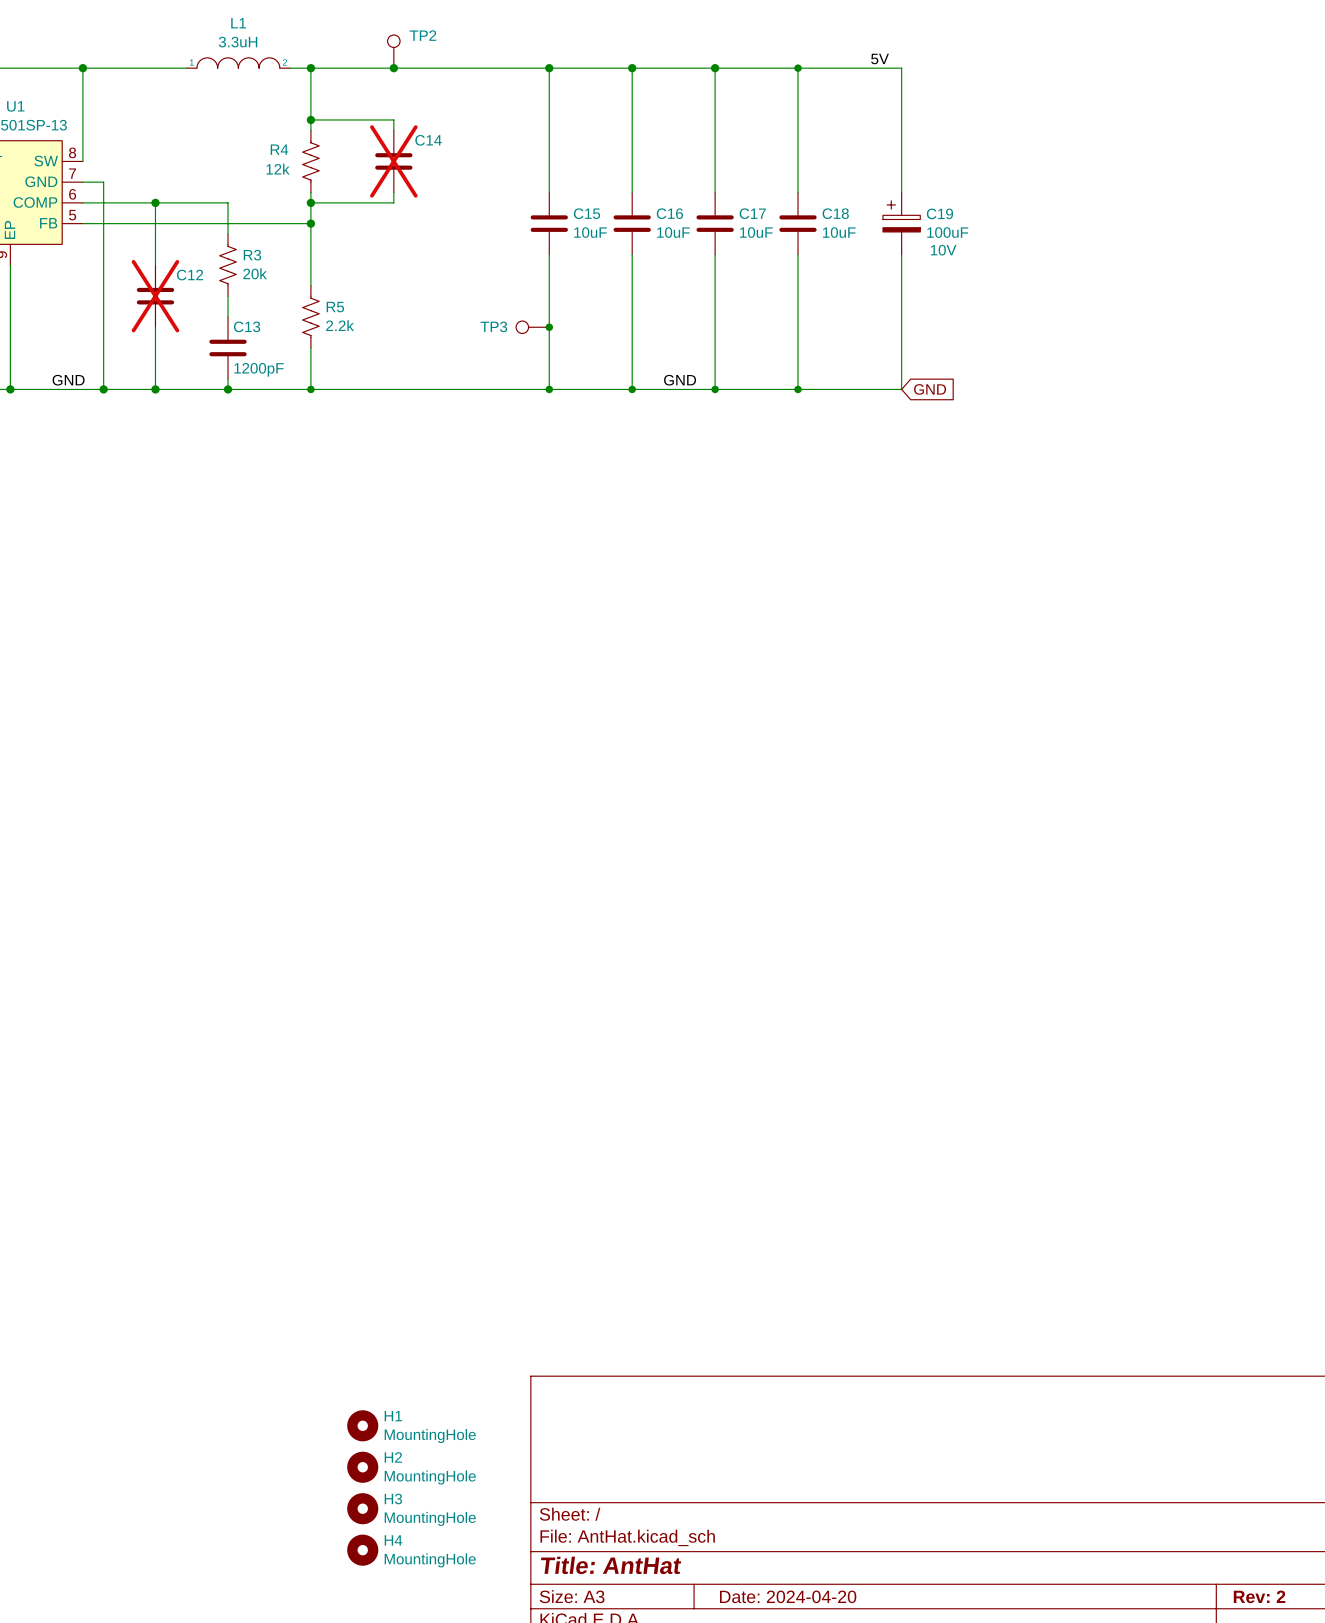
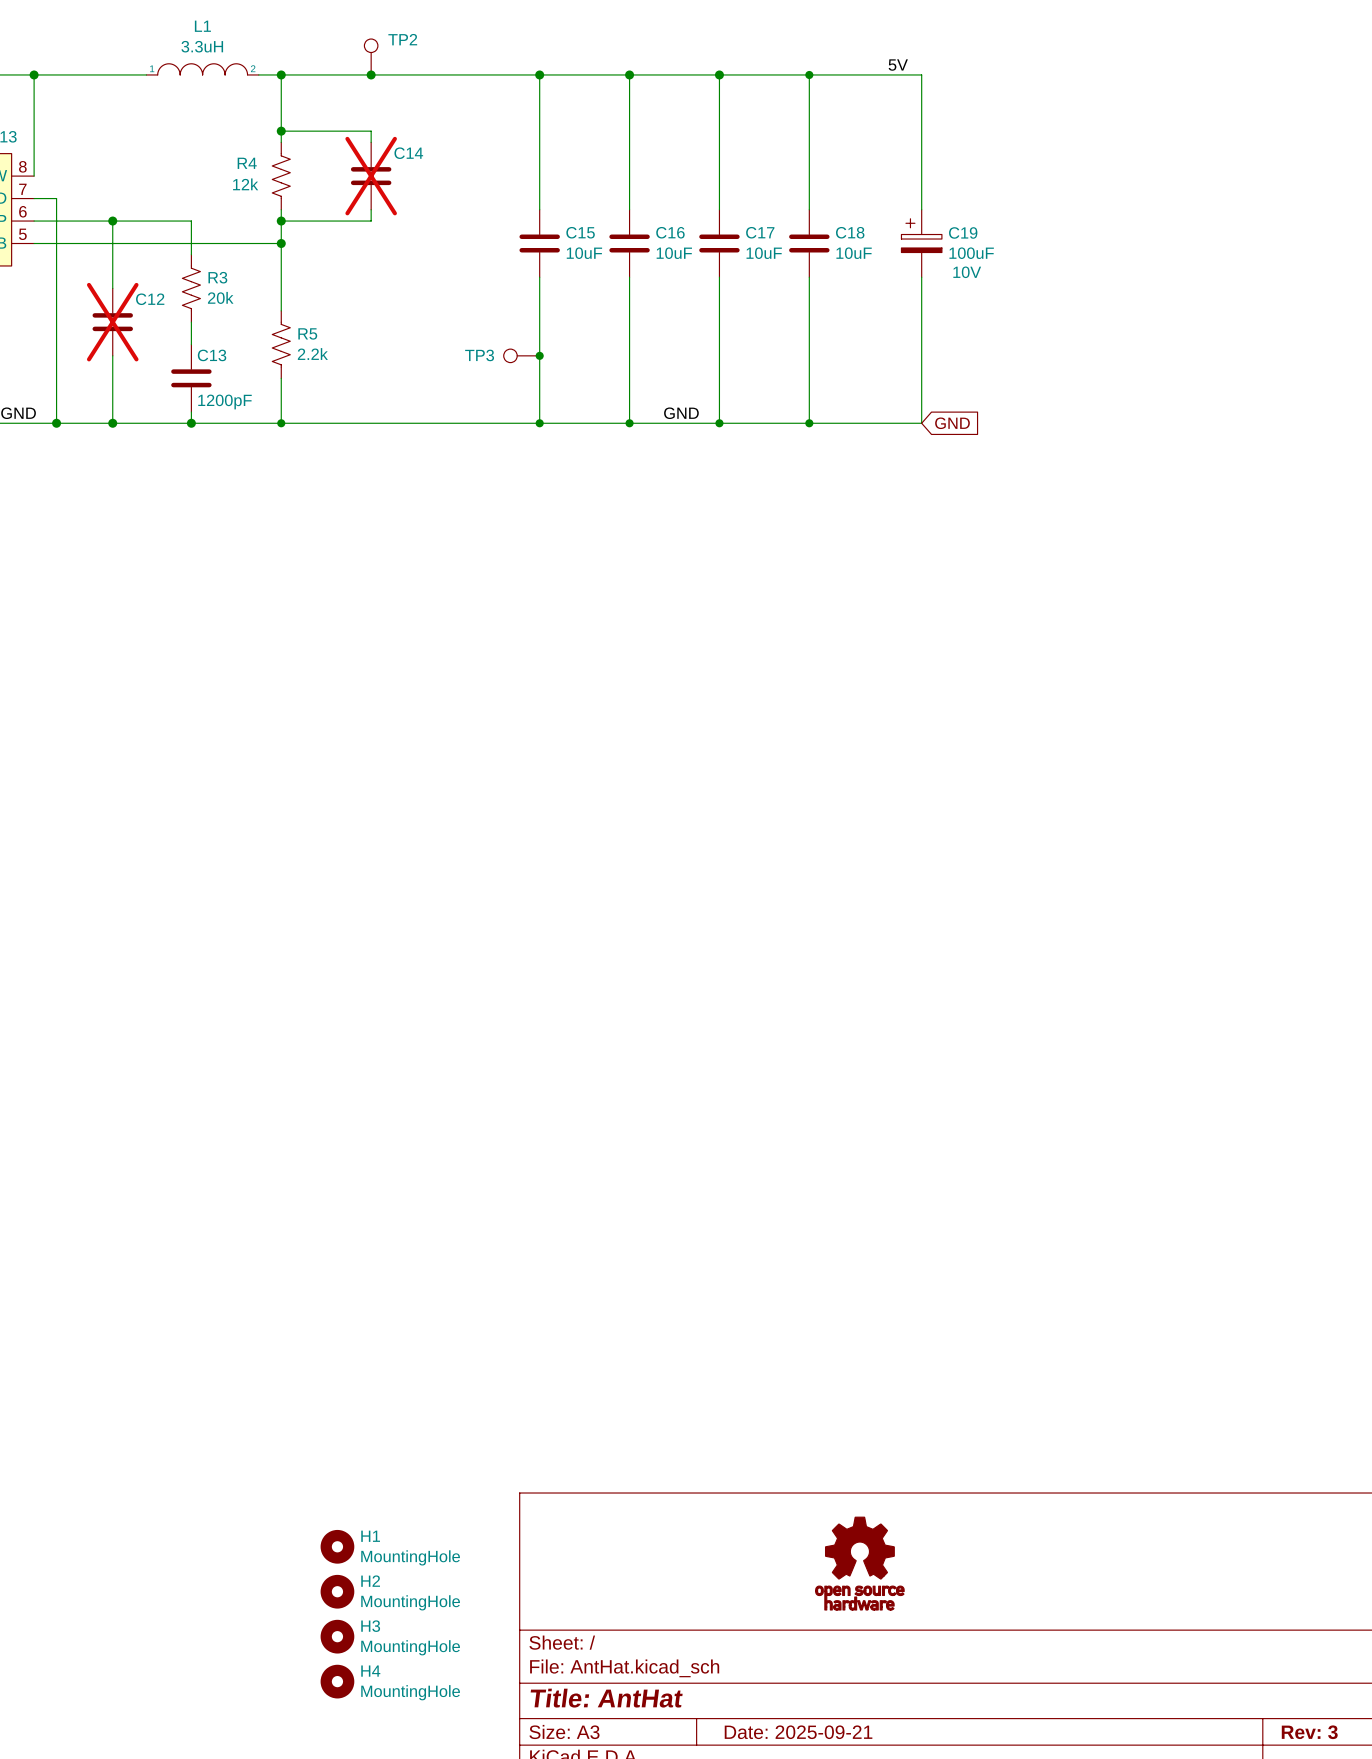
part: none -> (859, 1563)
title block: Date: 2024-04-20 (788, 1596) -> Date: 2025-09-21 (798, 1732)
title block: Rev: 2 (1259, 1596) -> Rev: 3 (1309, 1732)

